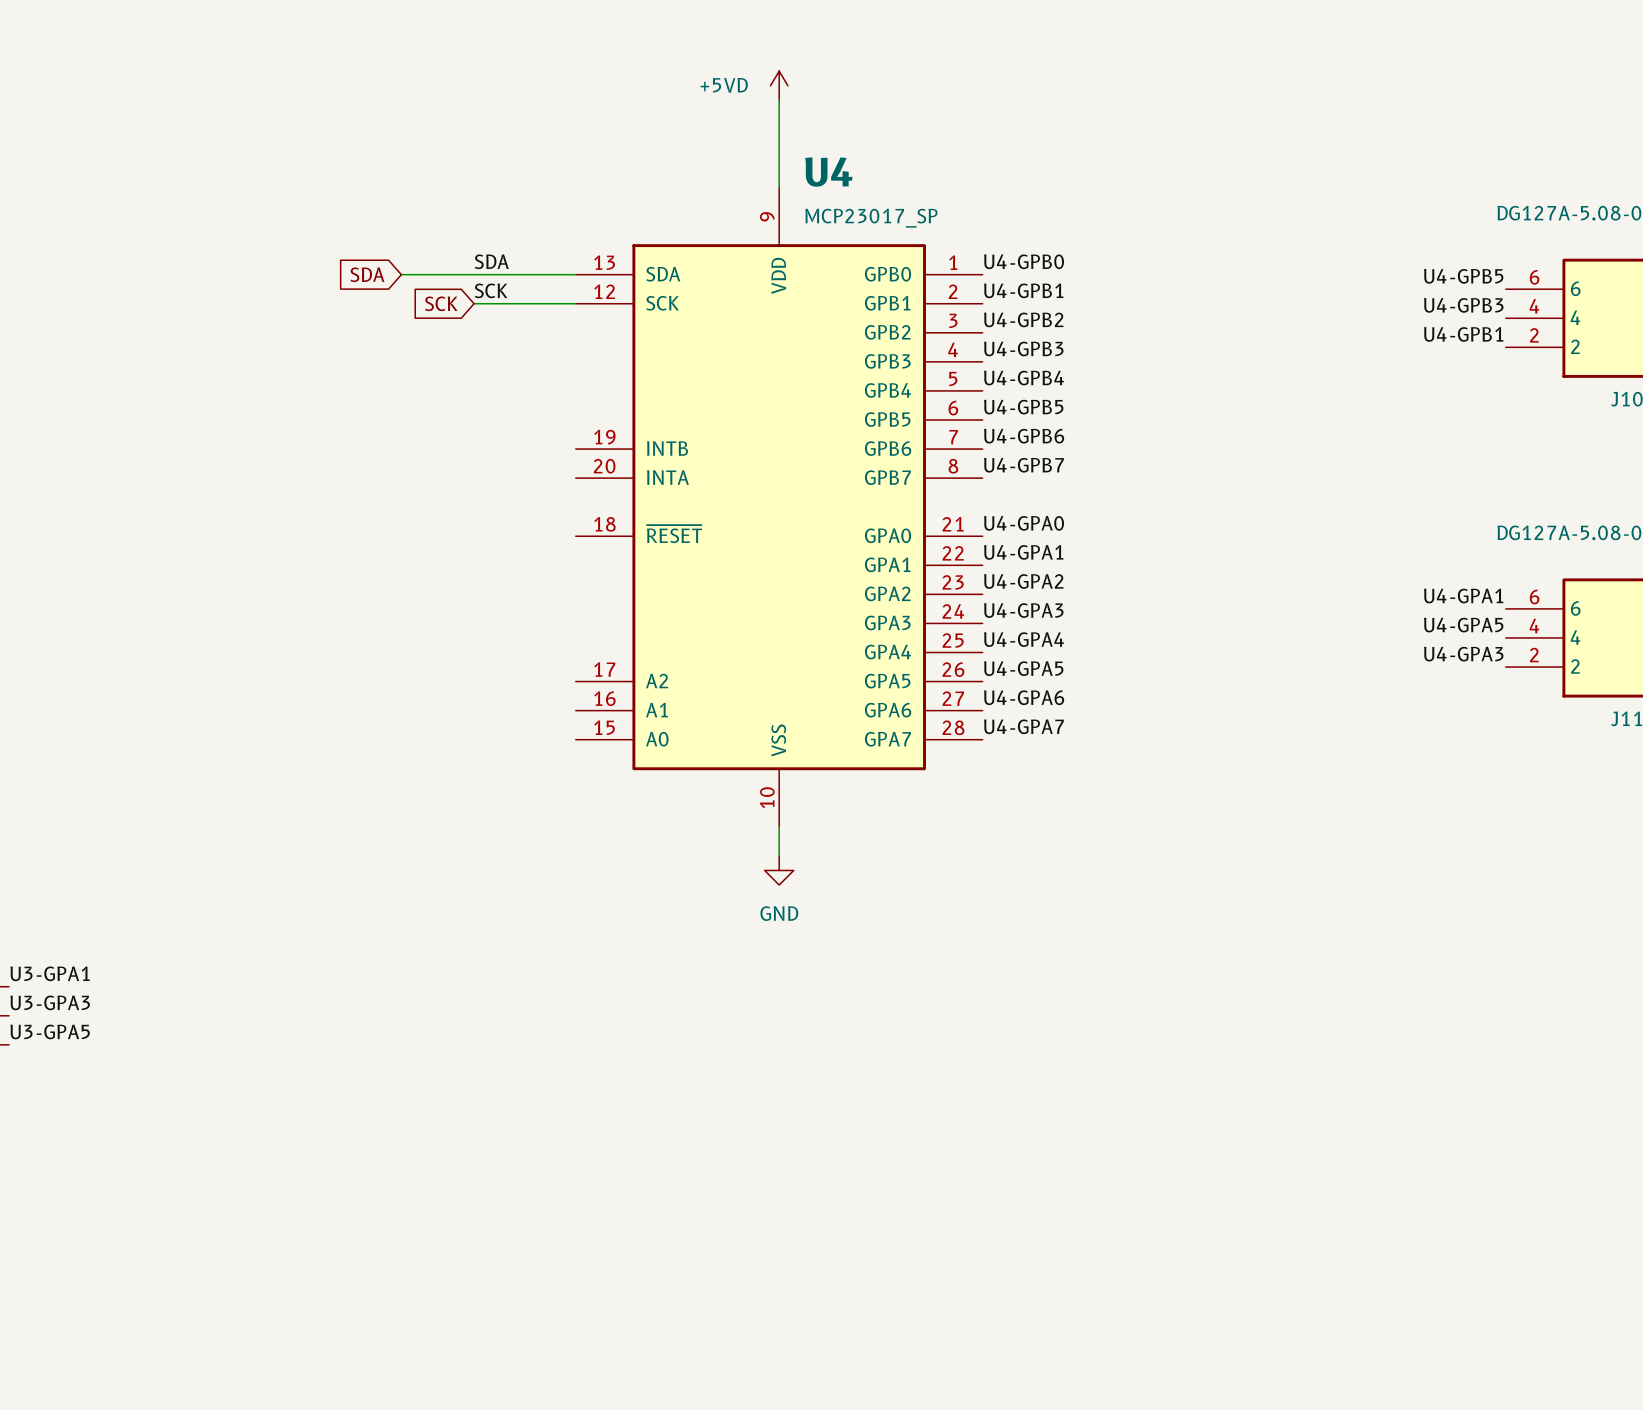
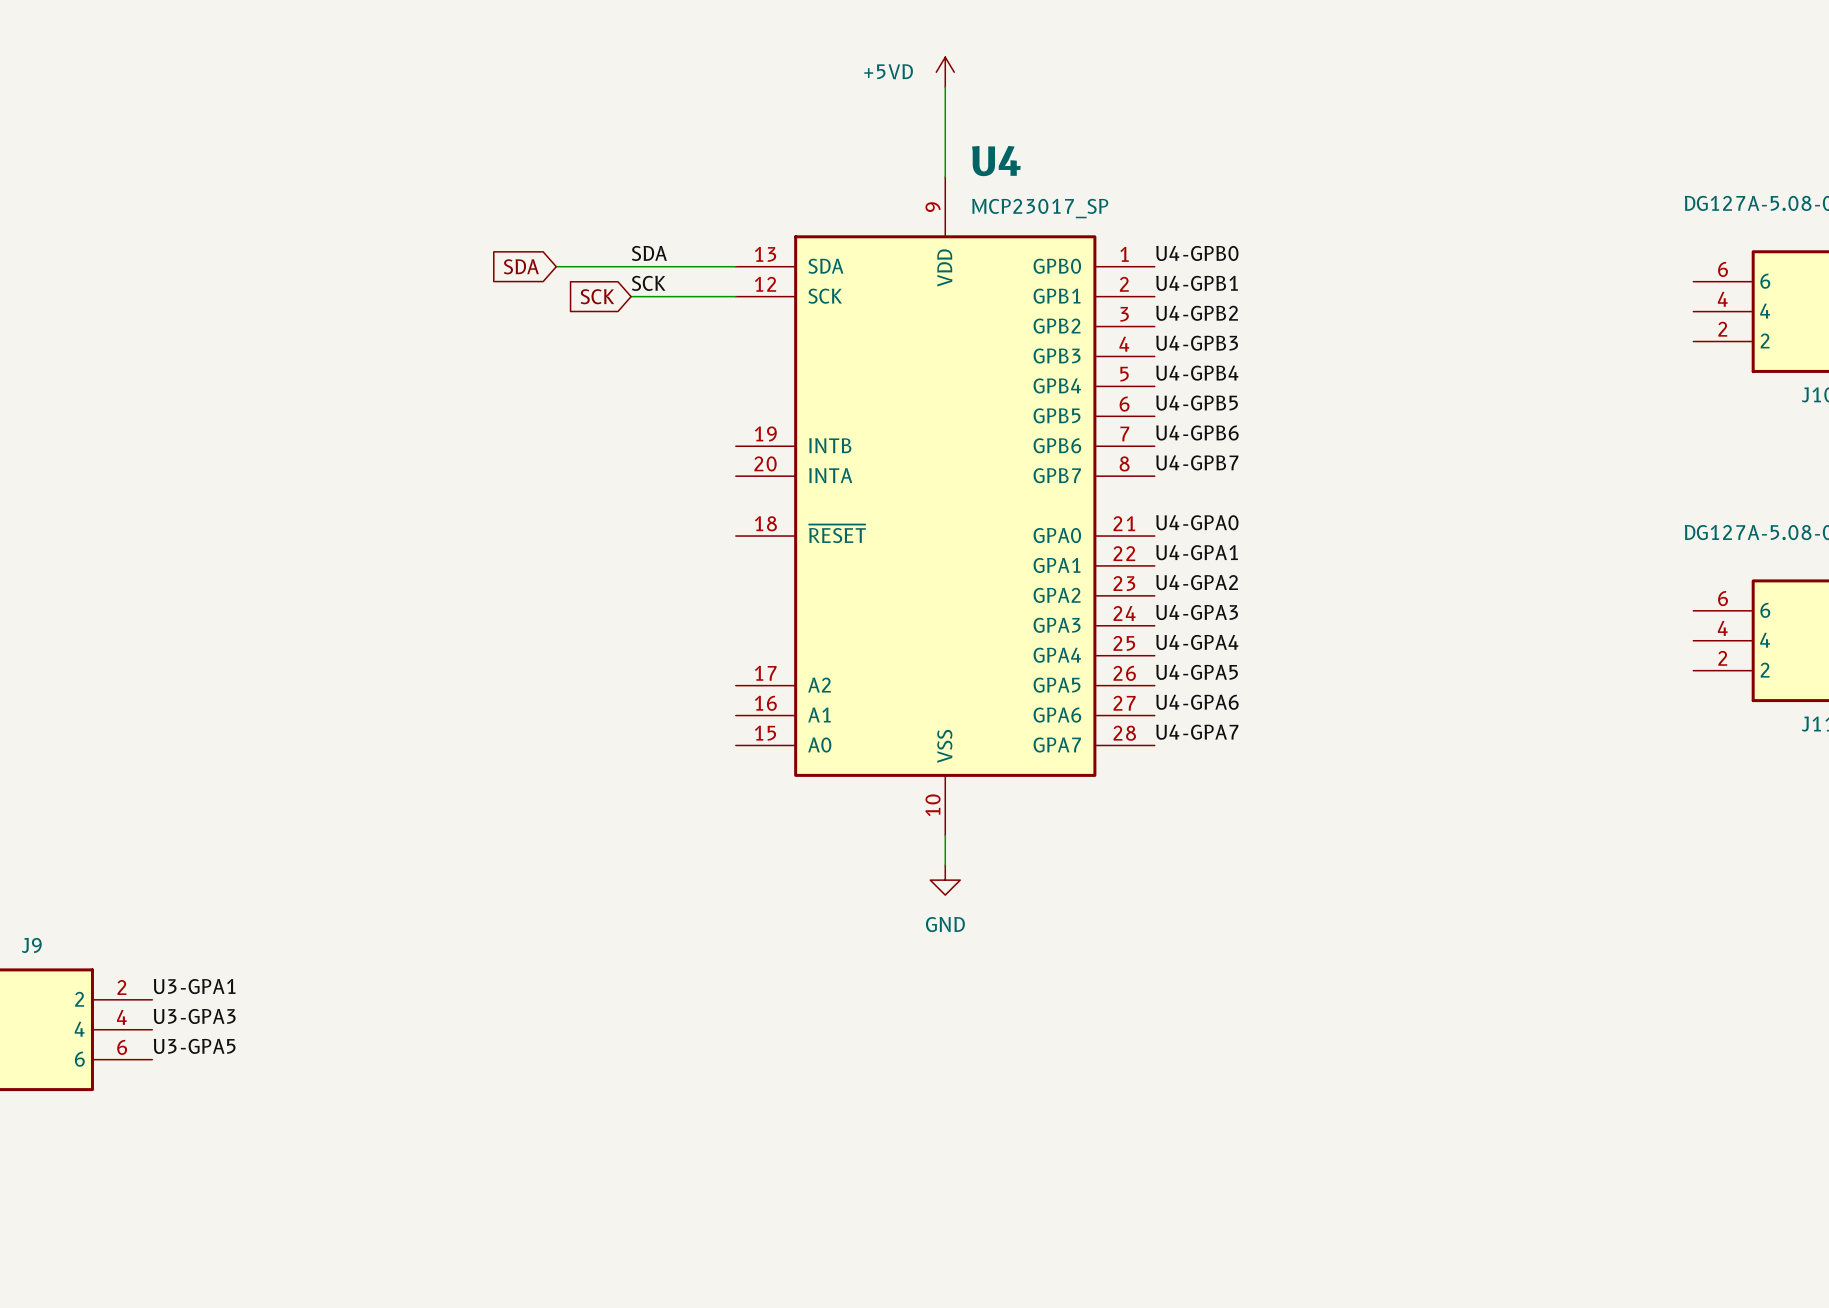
label: U4-GPB5 (1463, 276) -> none
label: U4-GPB3 (1463, 305) -> none
label: U4-GPB1 (1463, 334) -> none
label: U4-GPA1 (1463, 596) -> none
label: U4-GPA5 (1463, 625) -> none
label: U4-GPA3 (1463, 654) -> none

